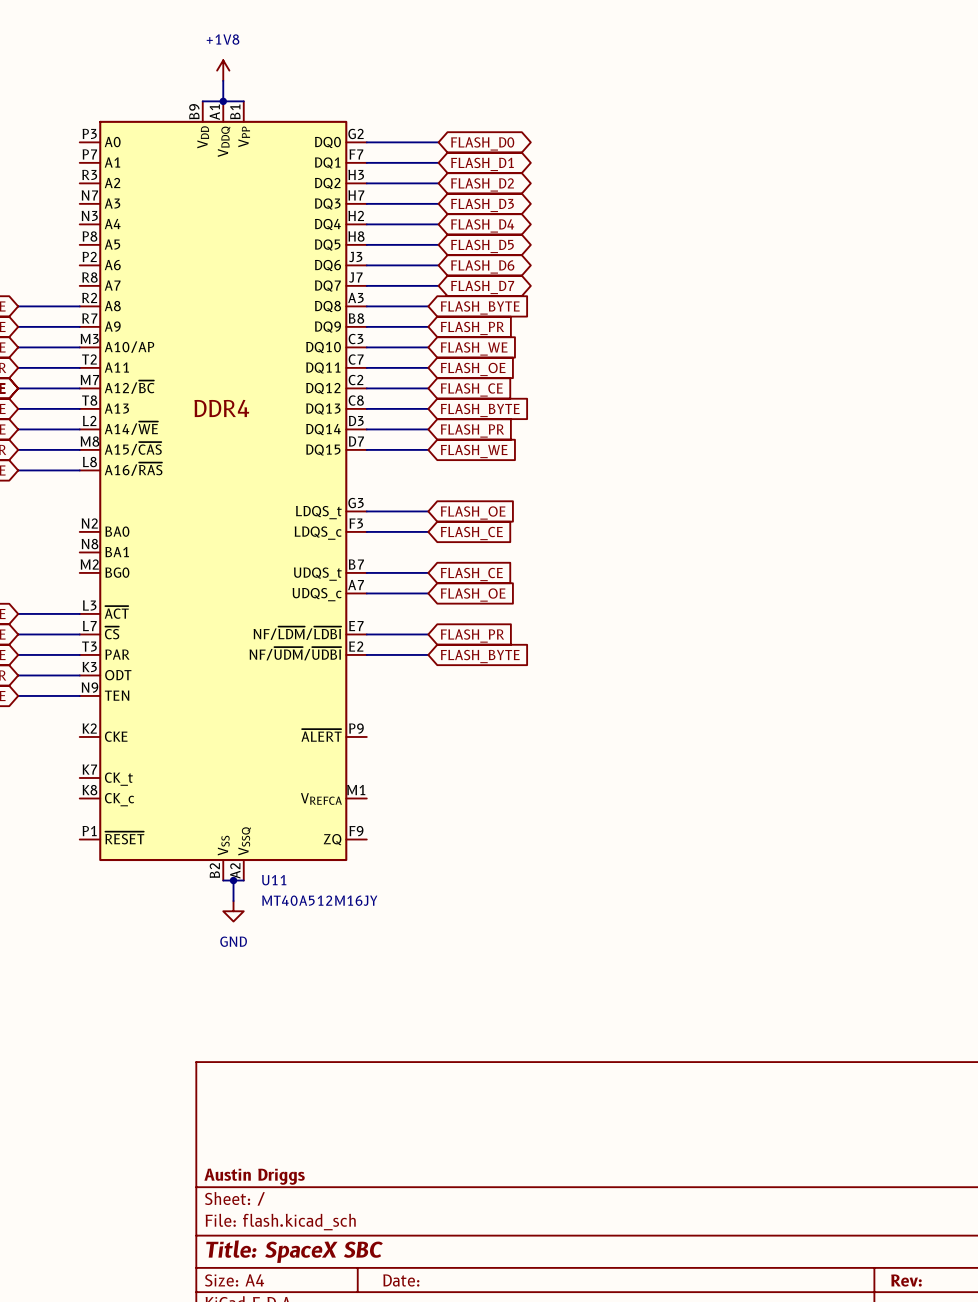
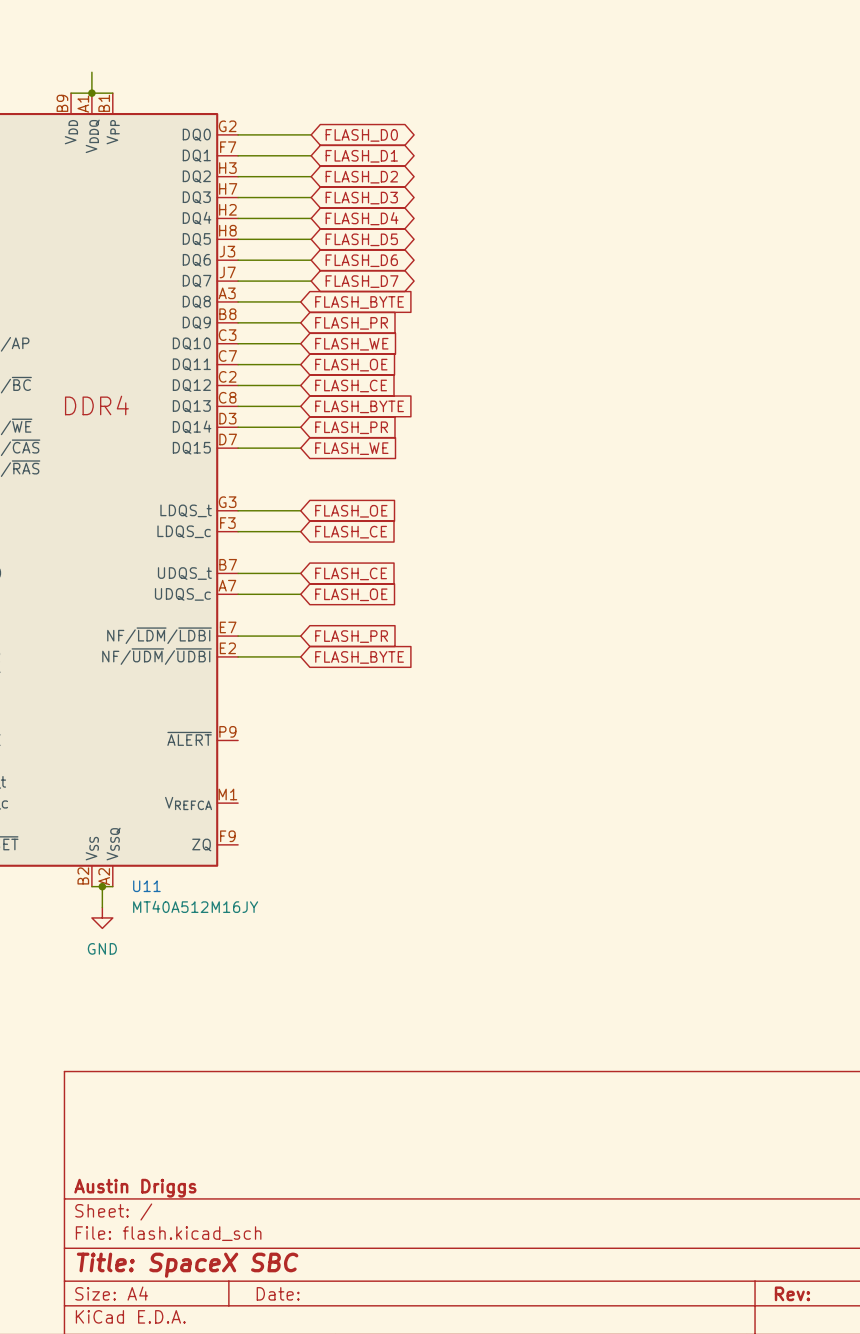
power symbol: +1V8 (223, 70) -> none

